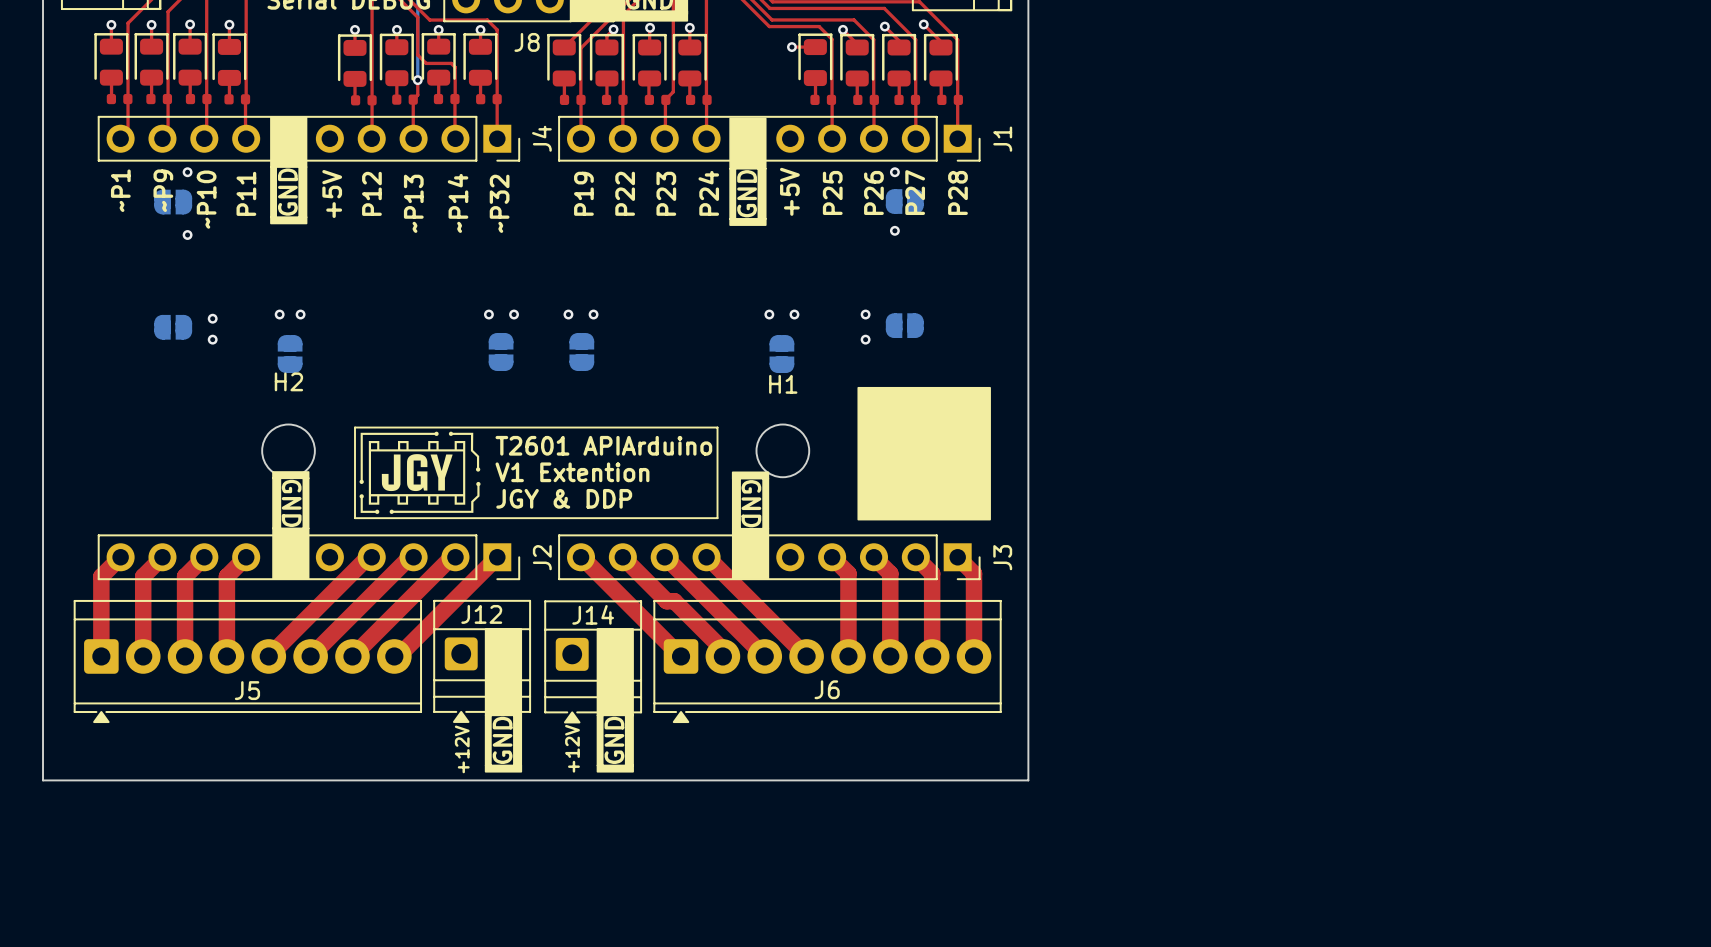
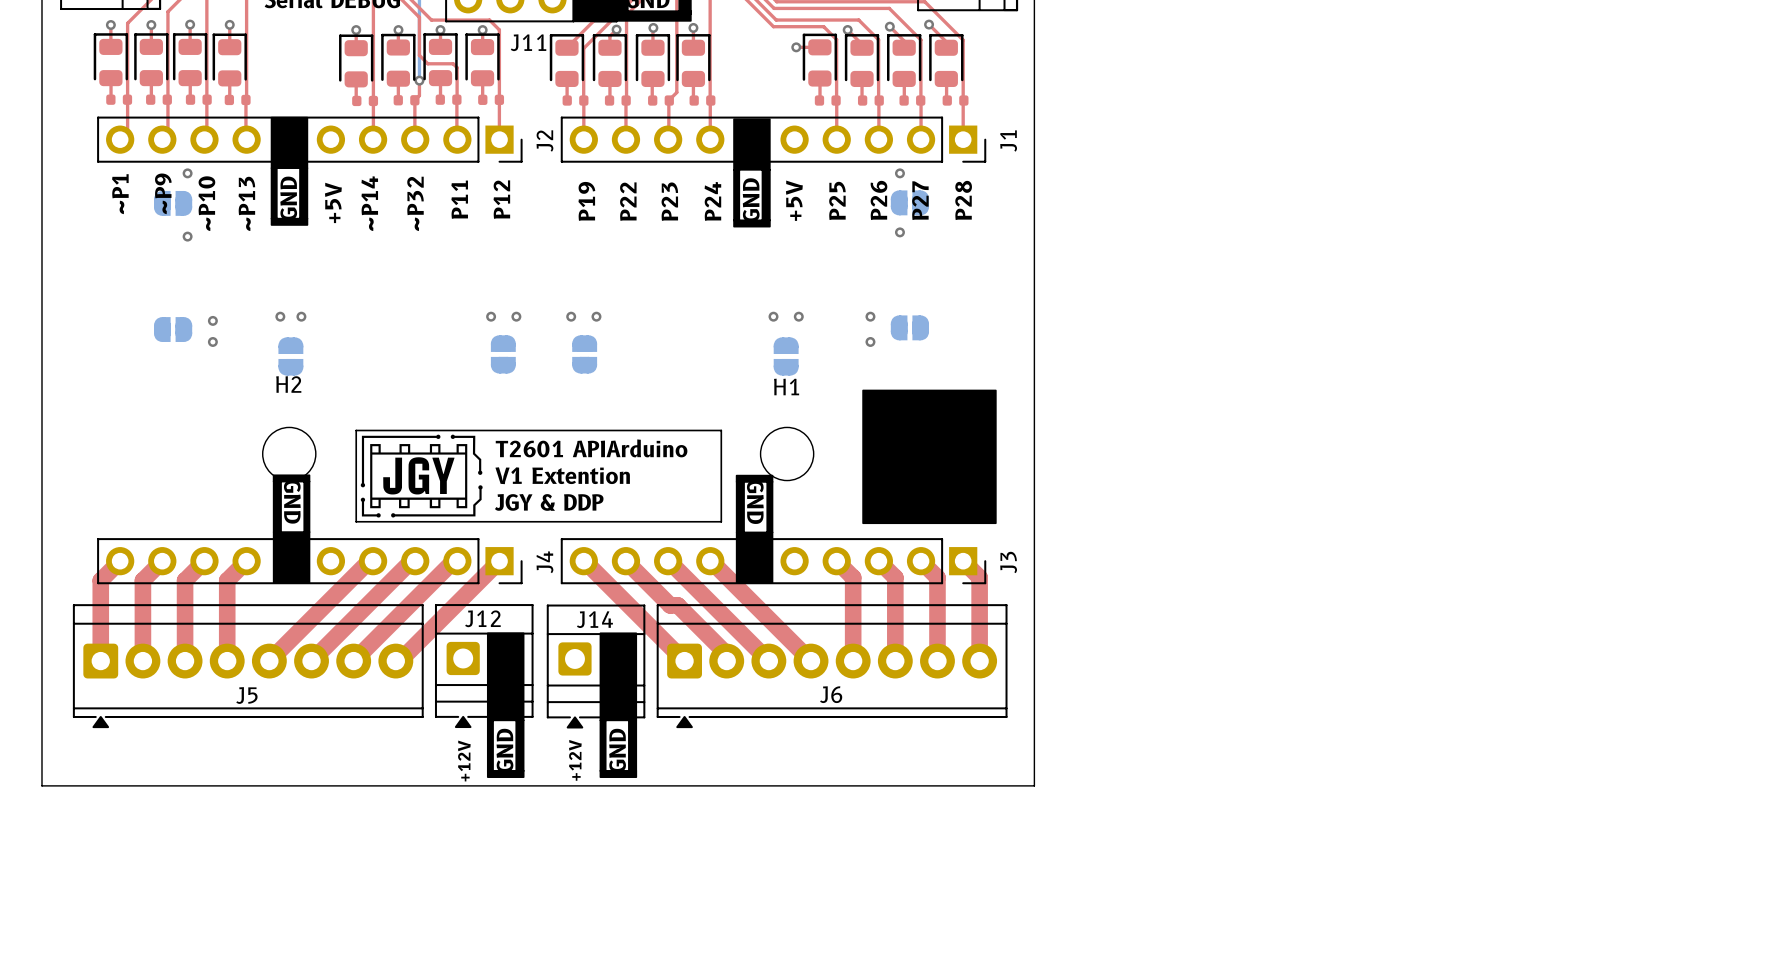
J8 name: J8 (527, 42) -> J11 (528, 42)
J4 name: J4 (541, 138) -> J2 (544, 140)
text: none -> P11 (459, 199)
text: none -> P12 (501, 199)
text: P11 (246, 193) -> ~P13 (246, 203)
text: P12 (371, 193) -> ~P14 (369, 203)
text: ~P13 (413, 203) -> ~P32 (415, 203)
text: ~P14 (458, 203) -> none
text: ~P32 (499, 203) -> none
J2 name: J2 (542, 557) -> J4 (544, 562)

